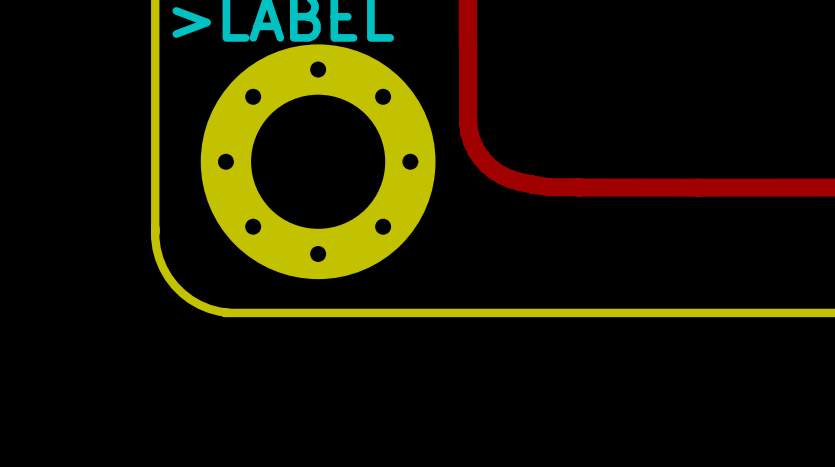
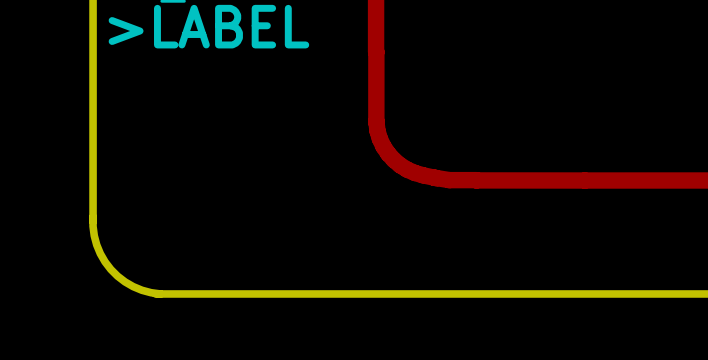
part: (318, 161) -> none

